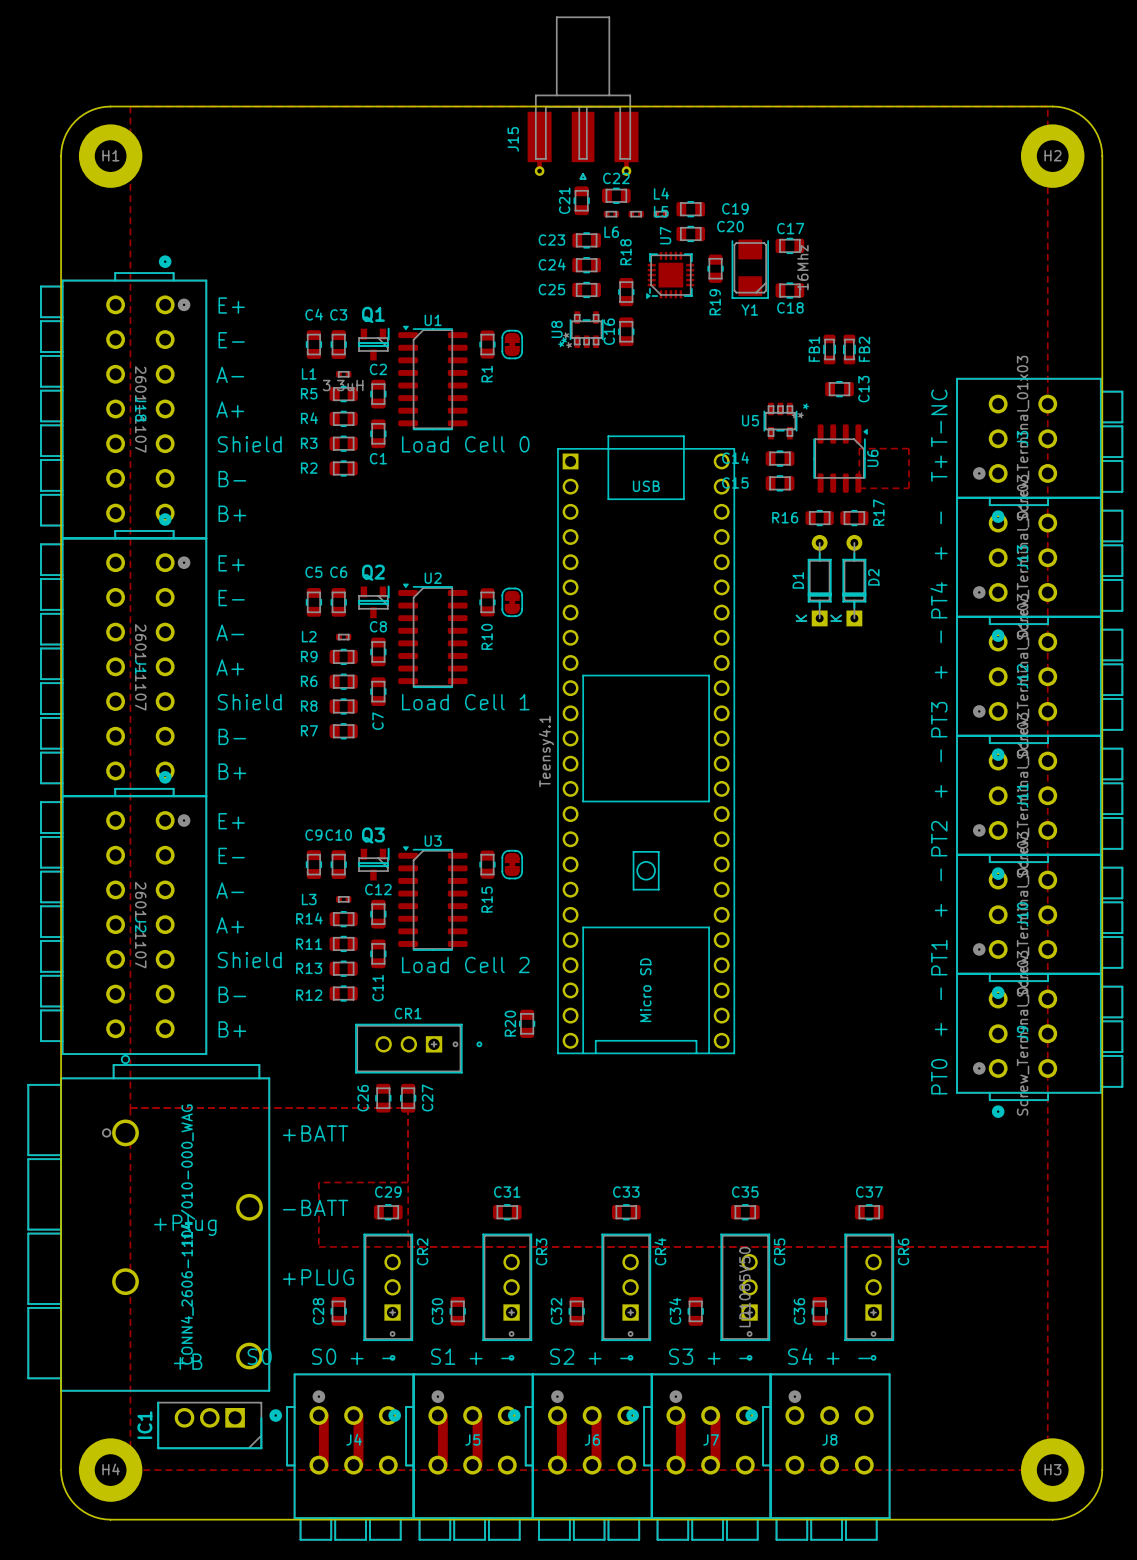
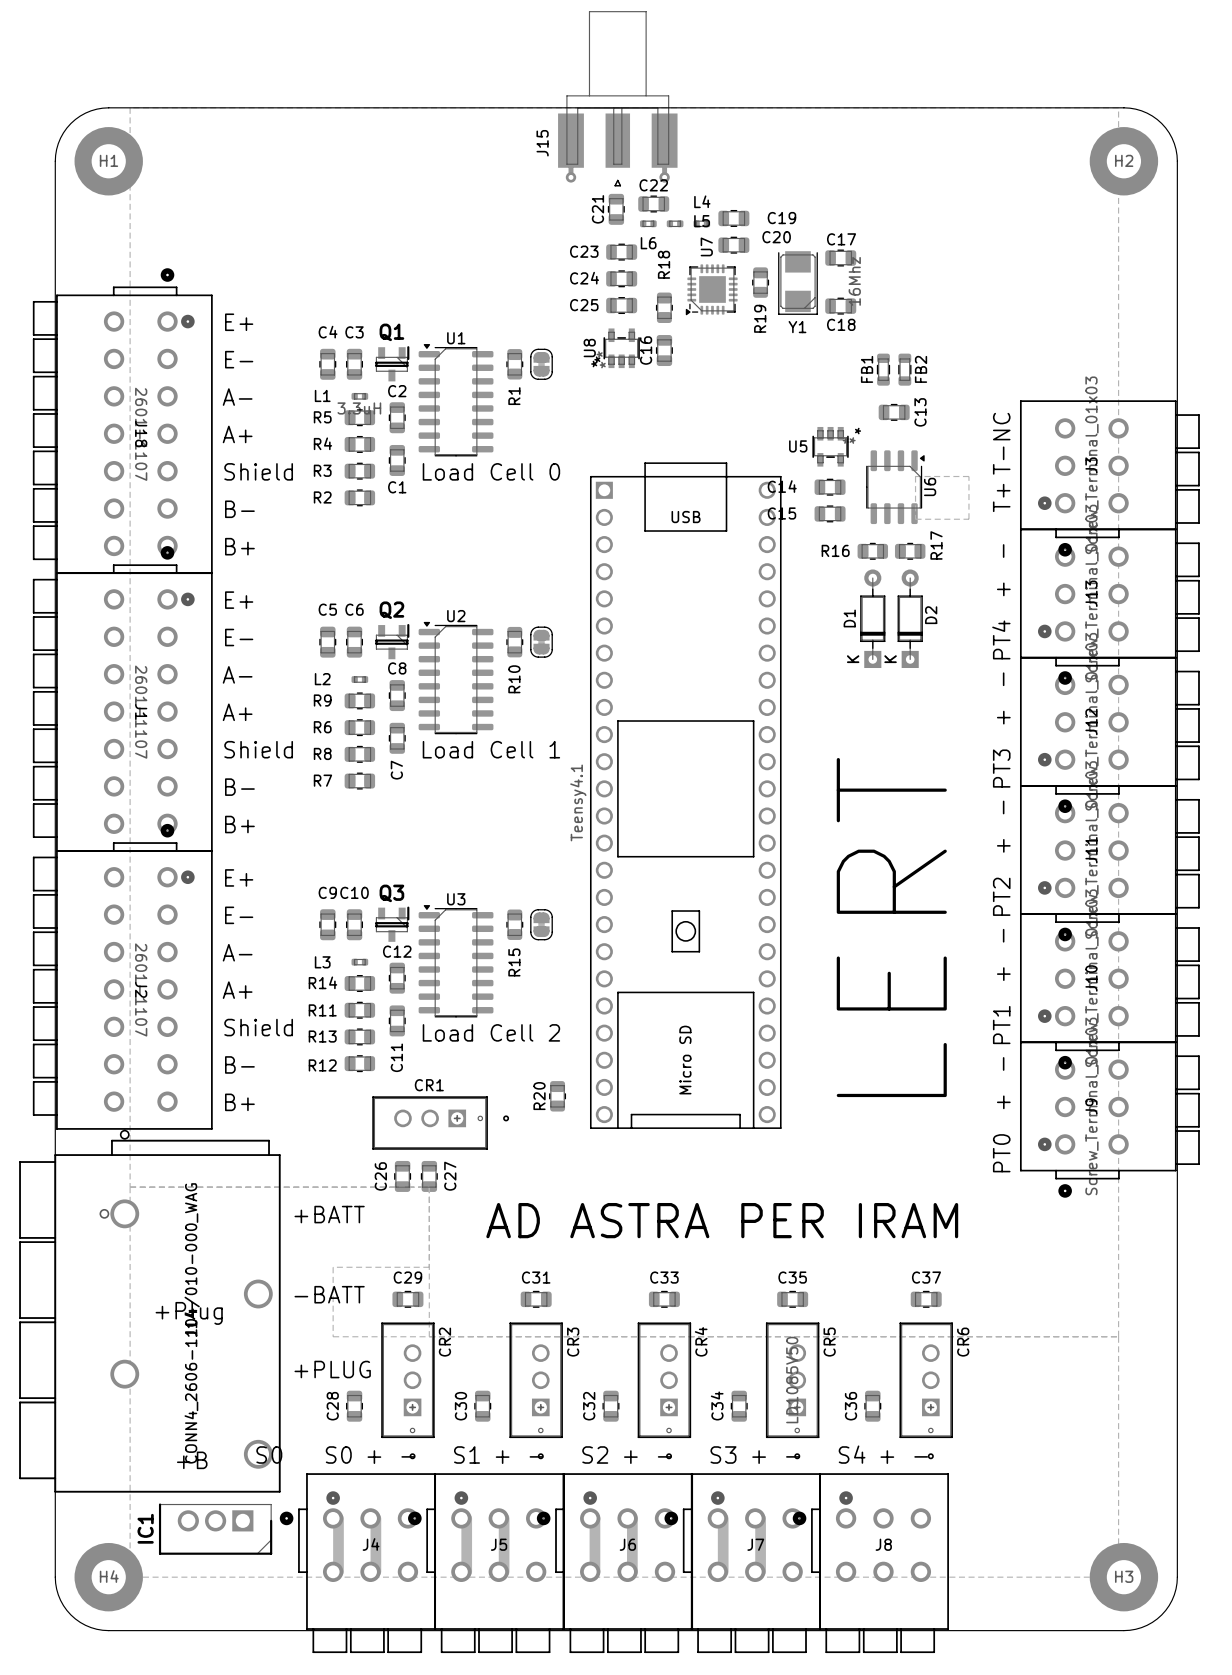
text: none -> LERT (891, 927)
text: none -> AD ASTRA PER IRAM (722, 1220)

